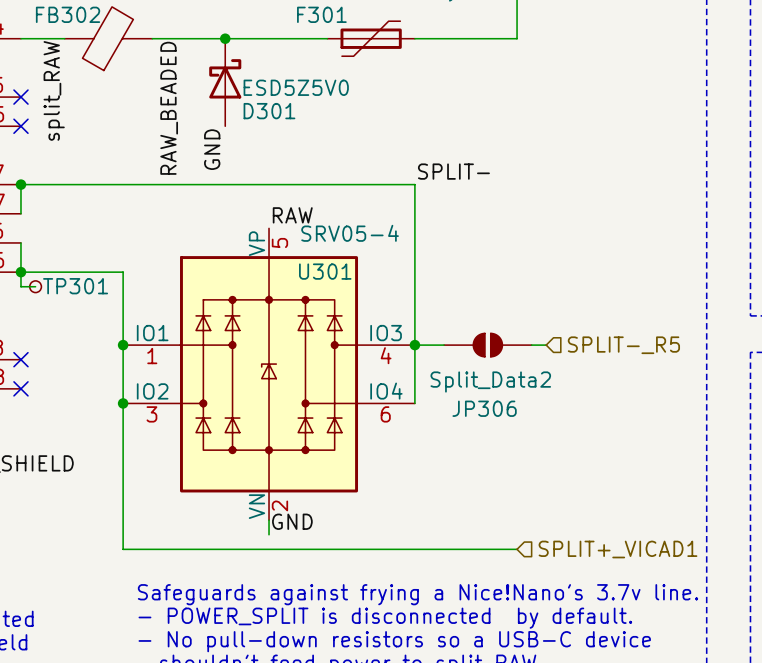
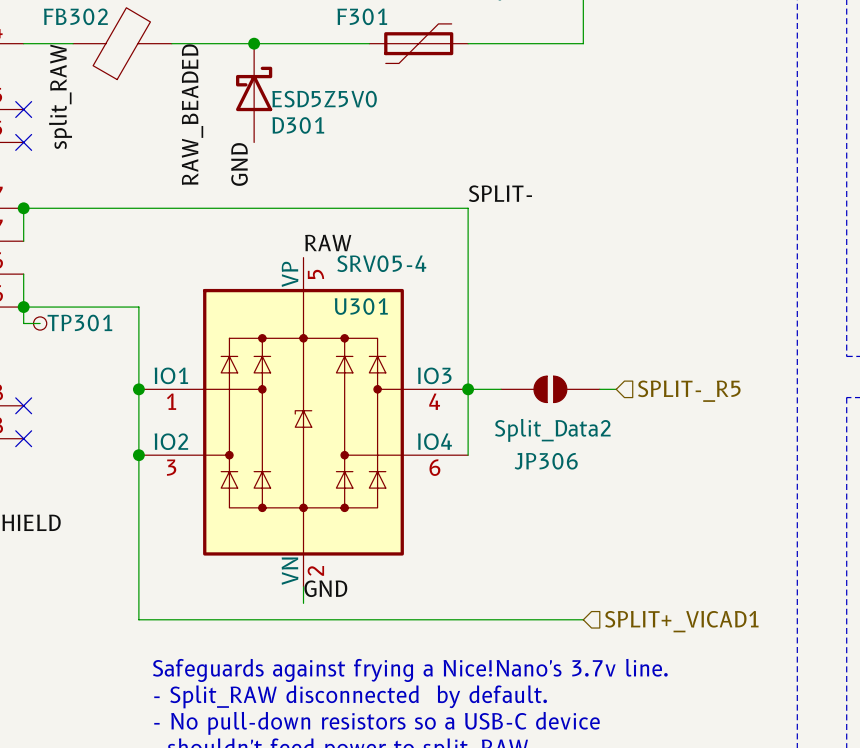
text: - POWER_SPLIT is disconnected by default. (385, 618) -> - Split_RAW disconnected by default. (350, 696)

